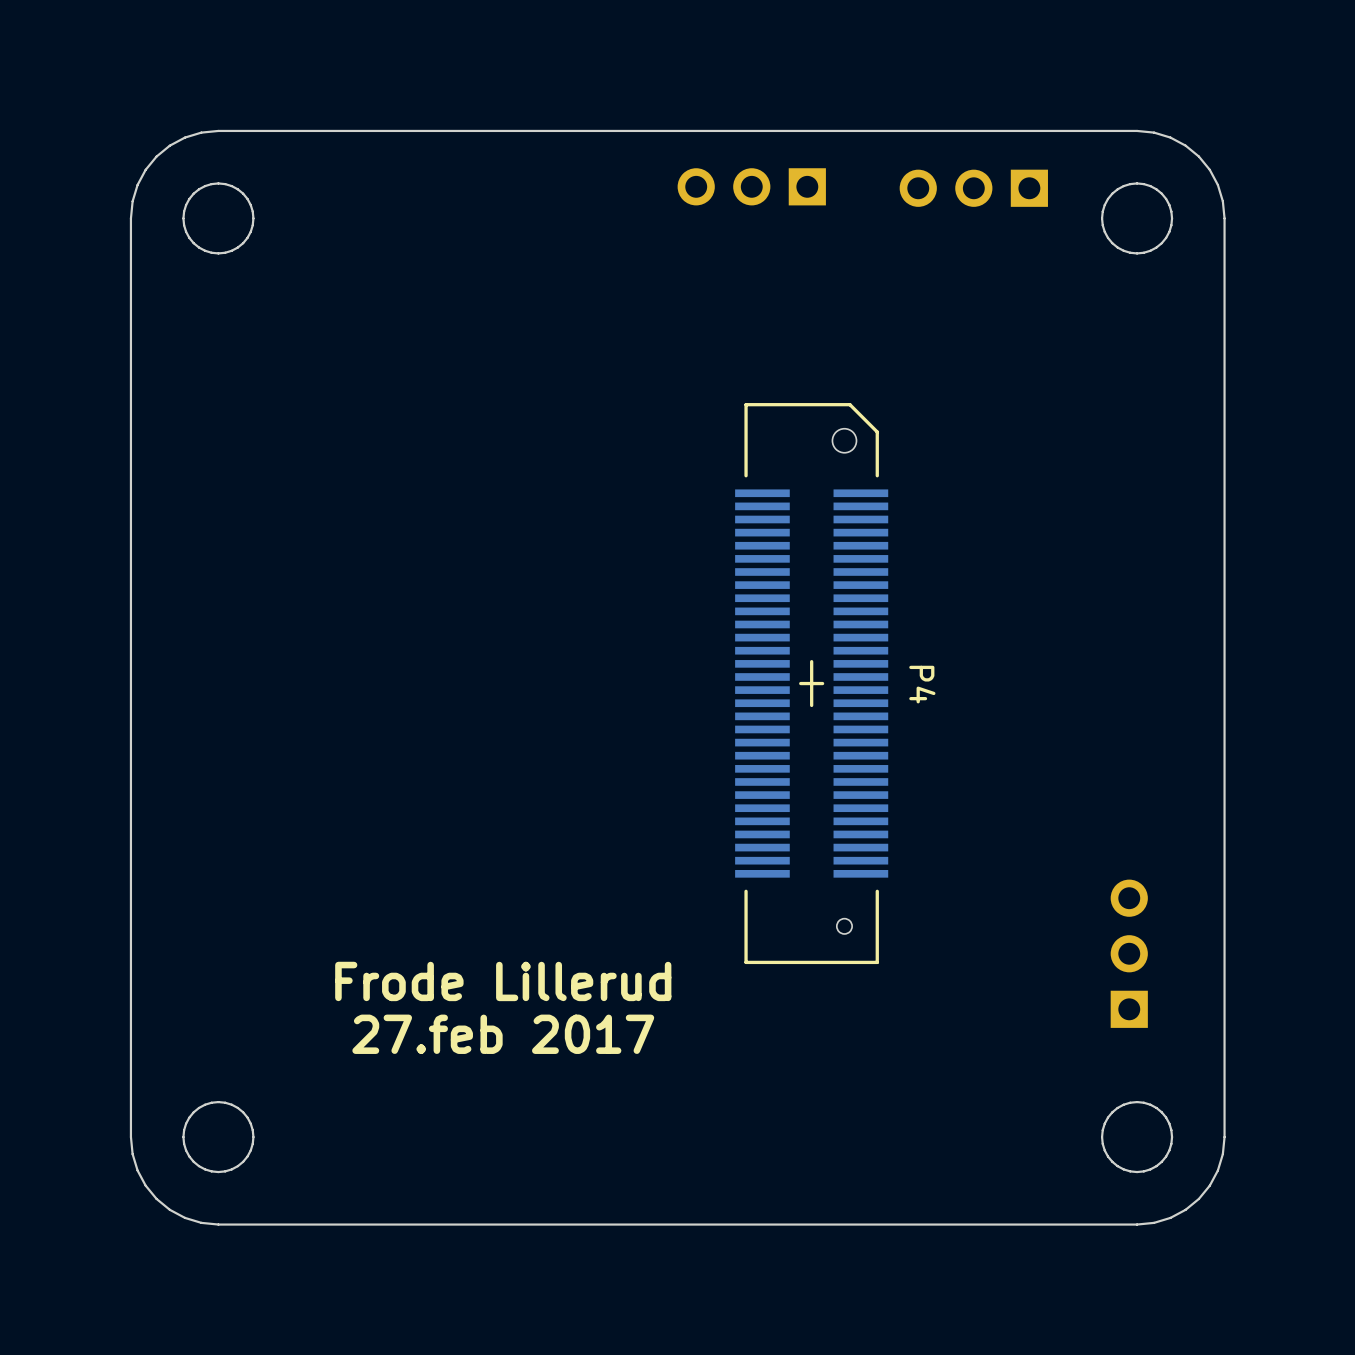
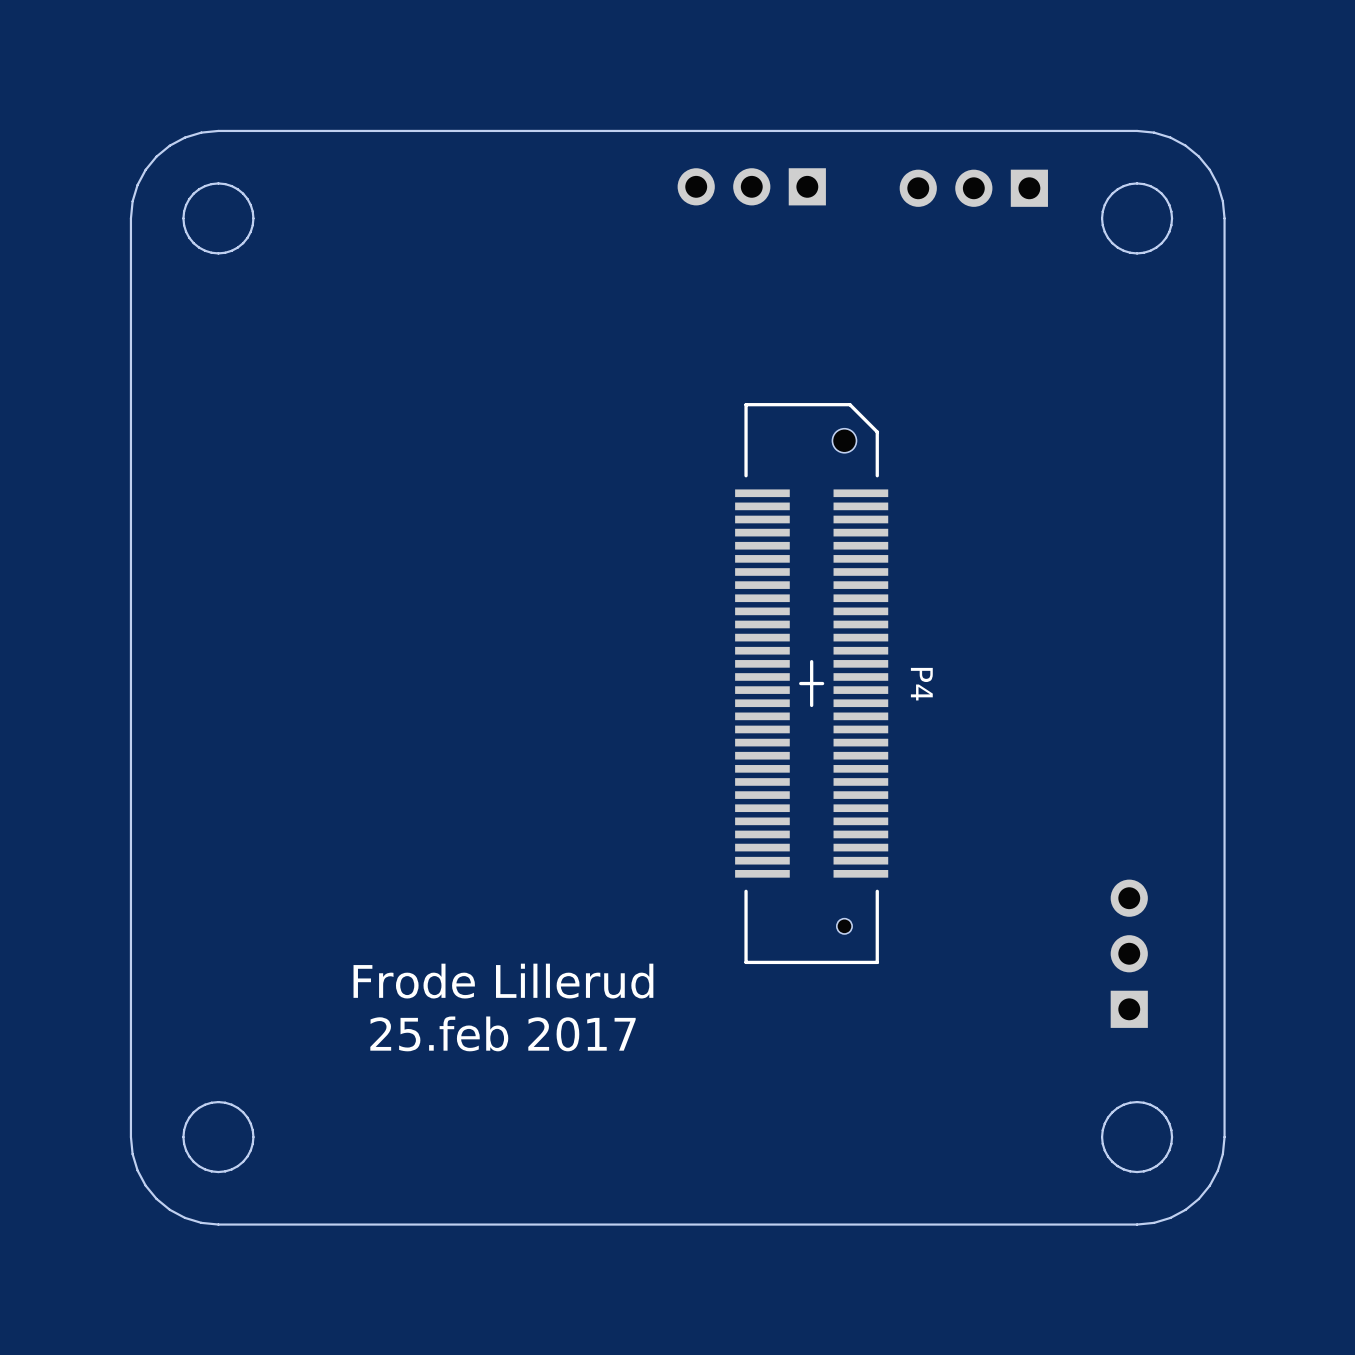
text: 27.feb 2017 (503, 1034) -> 25.feb 2017 (503, 1033)

